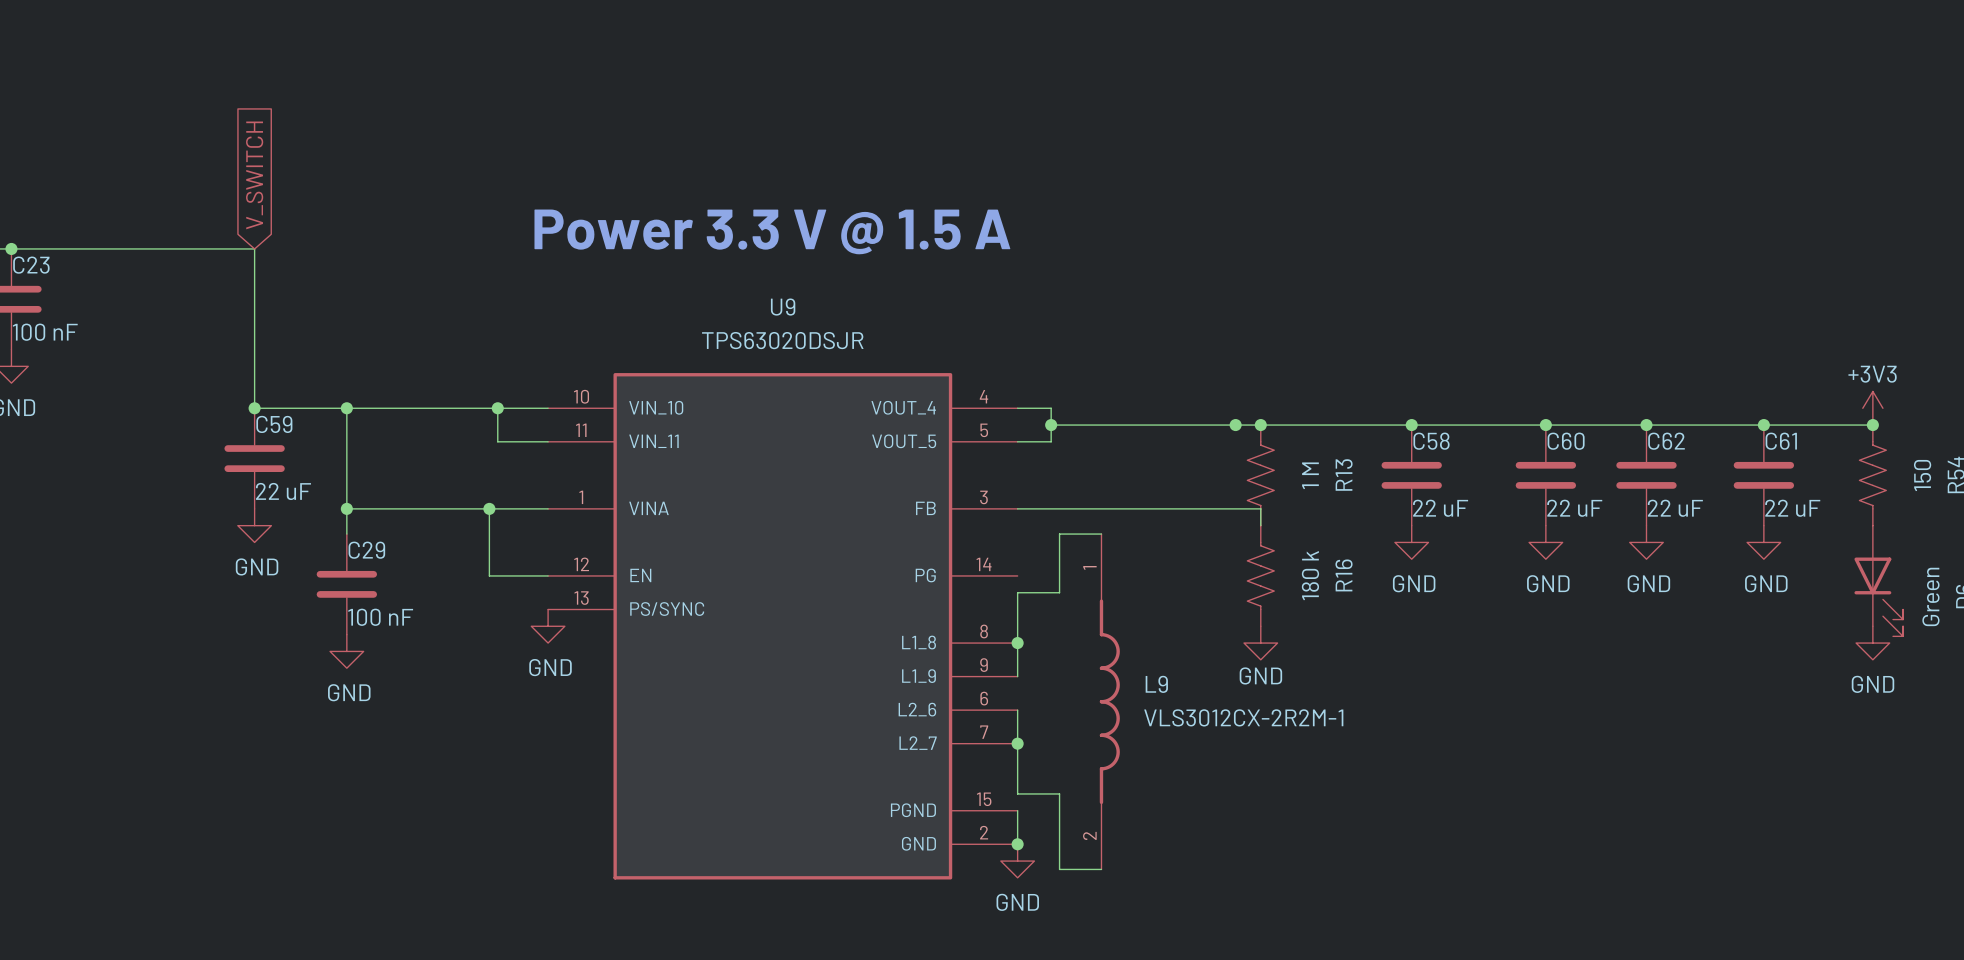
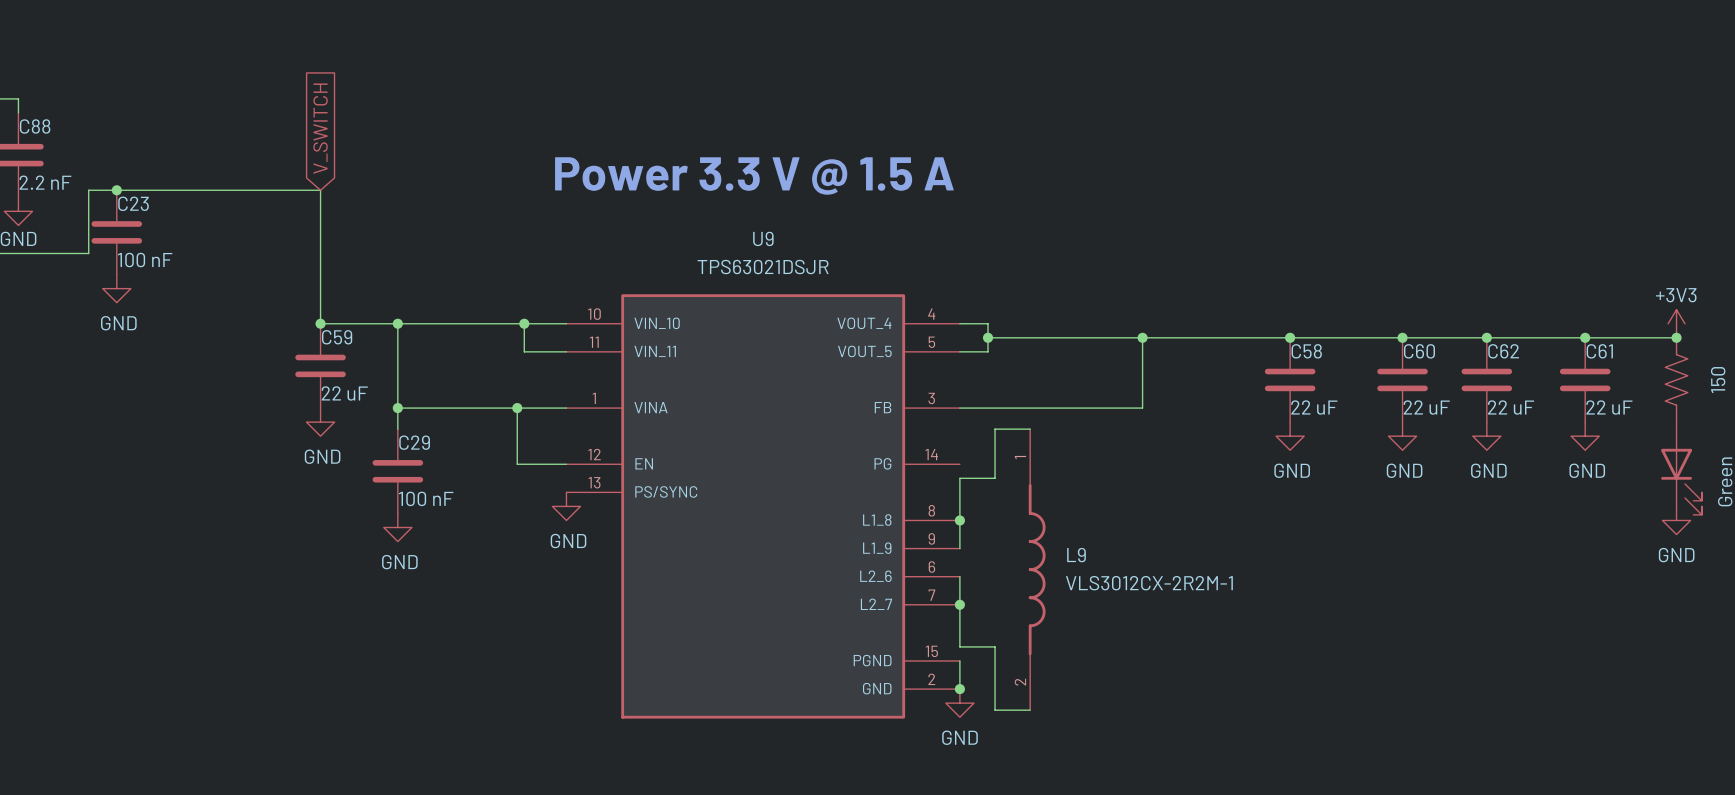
U9 value: TPS63020DSJR (782, 340) -> TPS63021DSJR (763, 267)
junction: (1260, 425) -> none
R13: 1 M (1260, 475) -> none
wire: (1235, 508) (1260, 508) (1260, 525) -> (1142, 408) (1142, 337)
R16: 180 k (1260, 575) -> none
power symbol: GND (1260, 643) -> none

